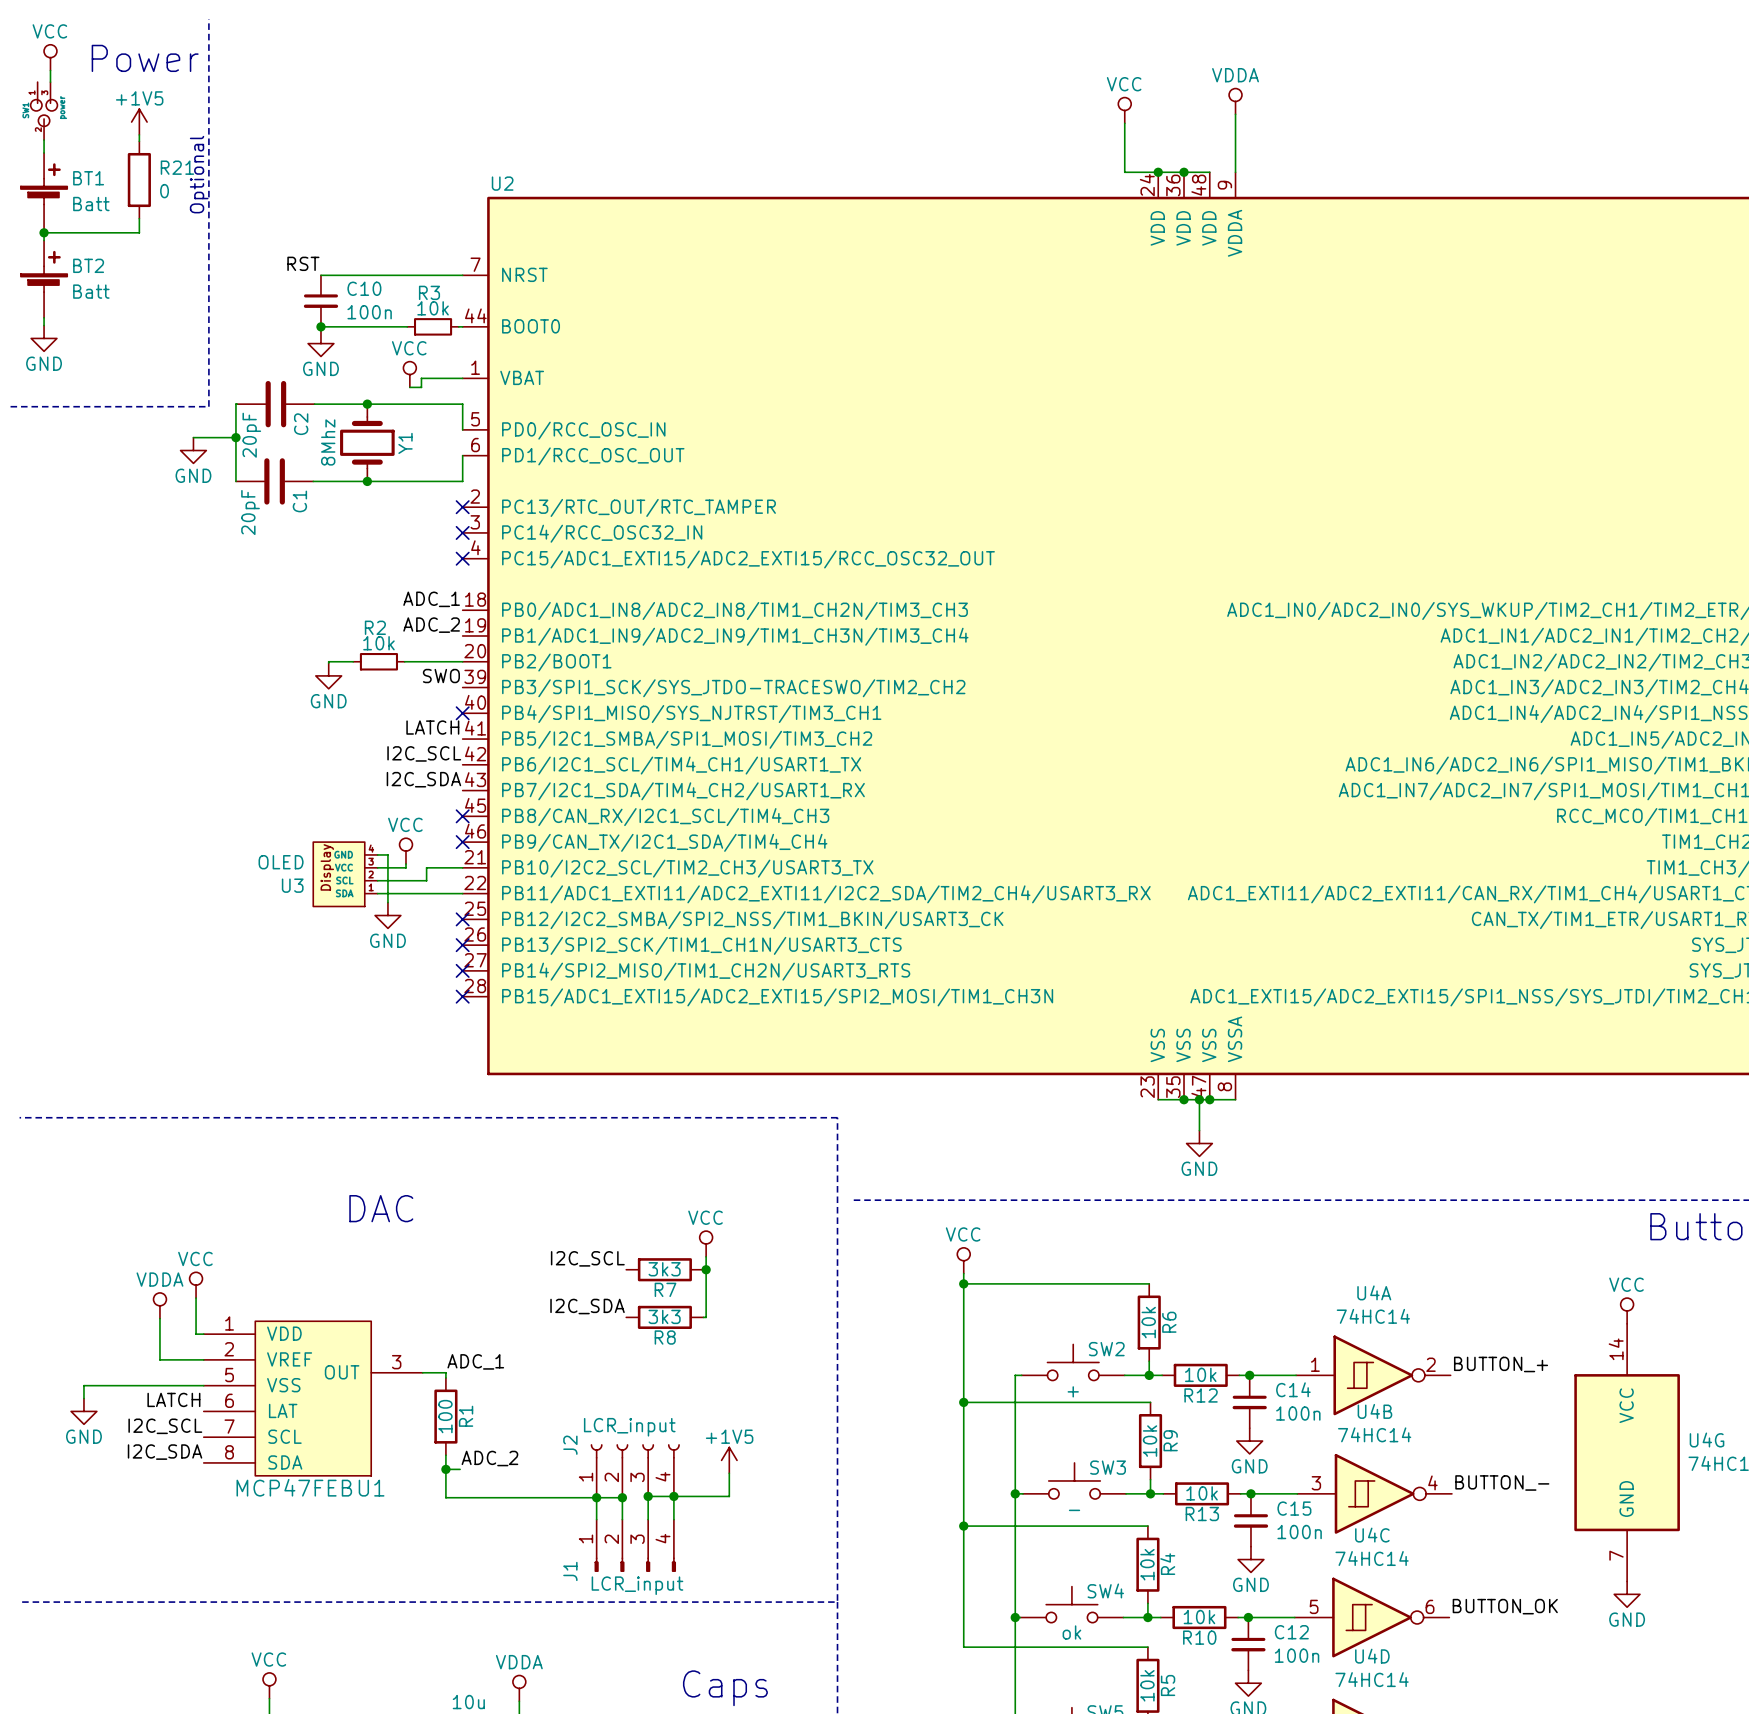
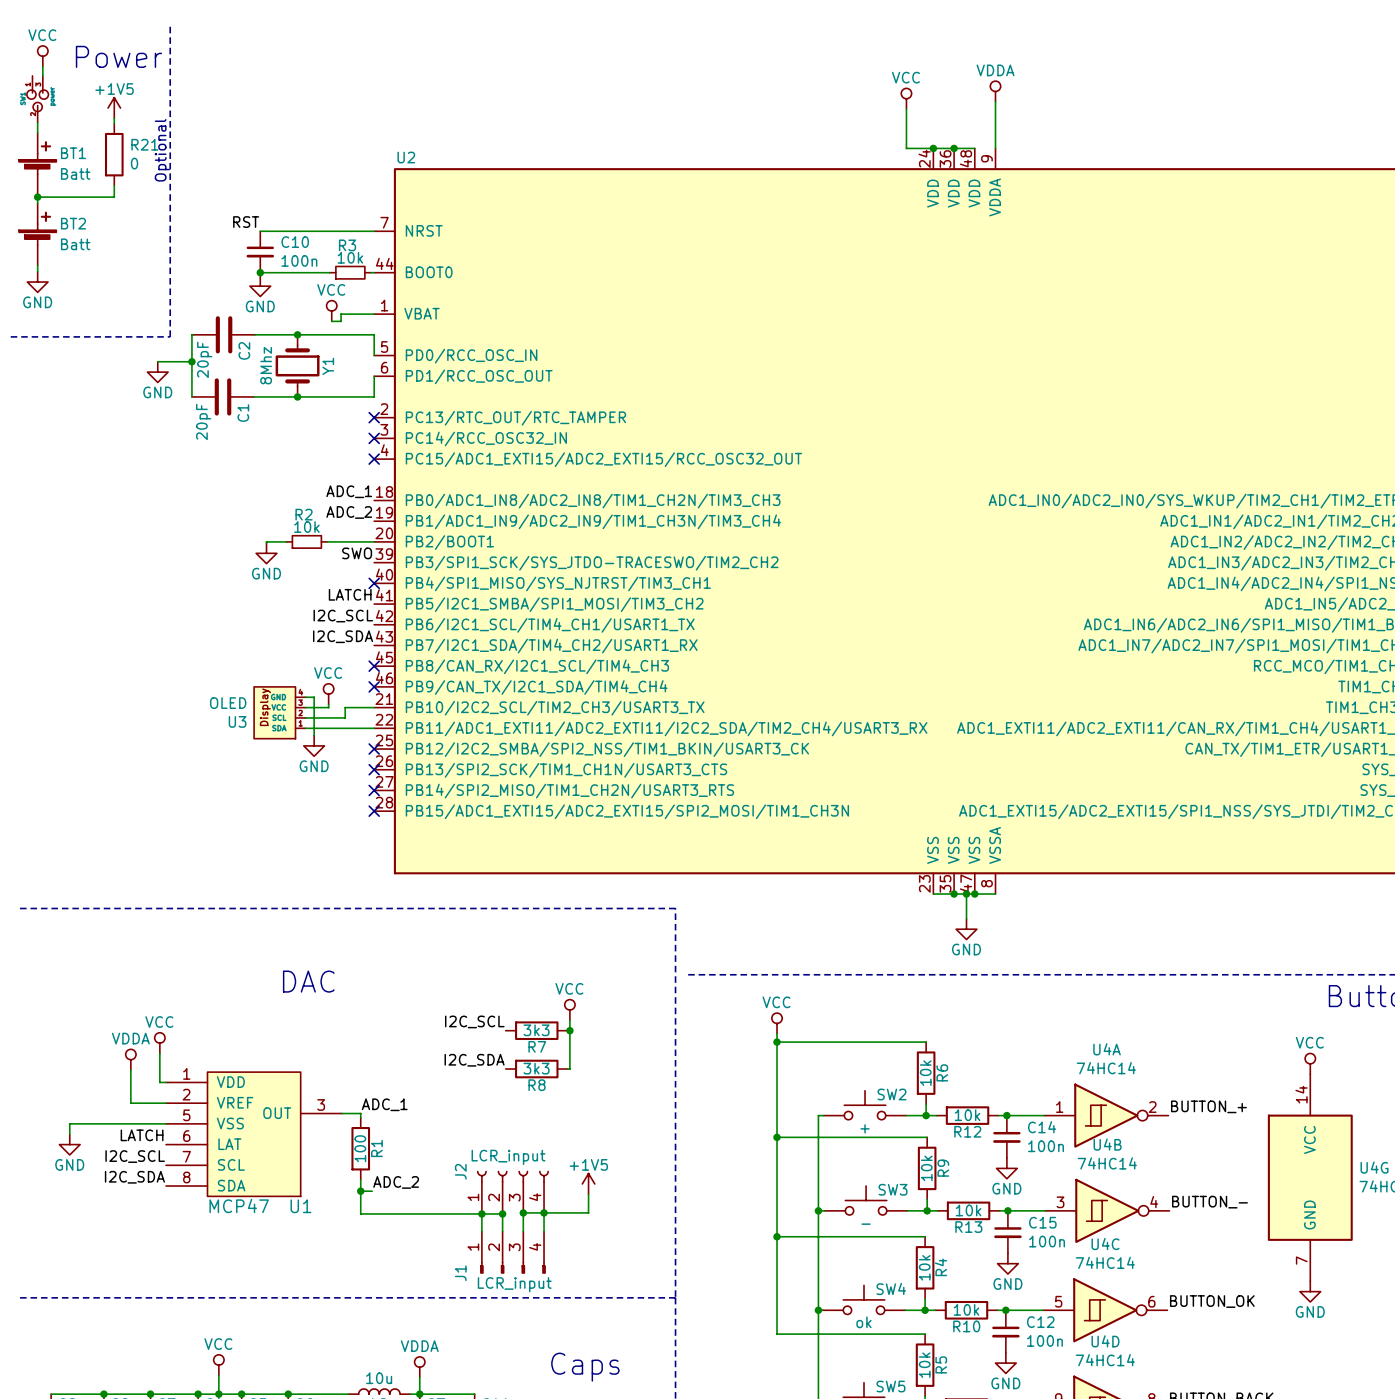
U1 value: MCP47FEB (294, 1487) -> MCP47 (239, 1205)

